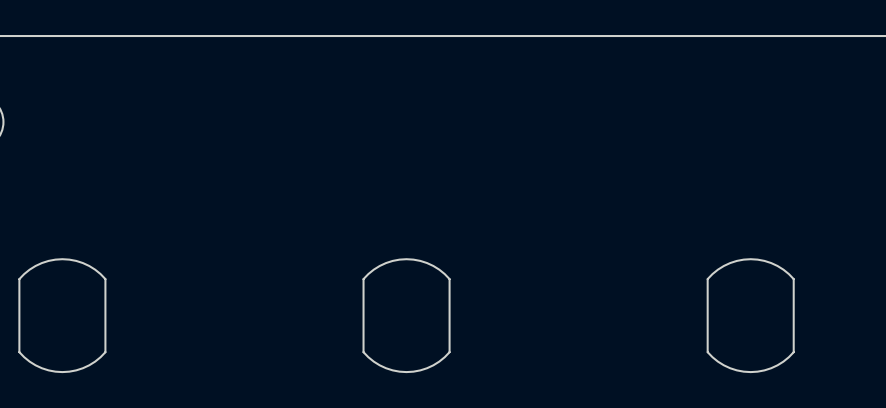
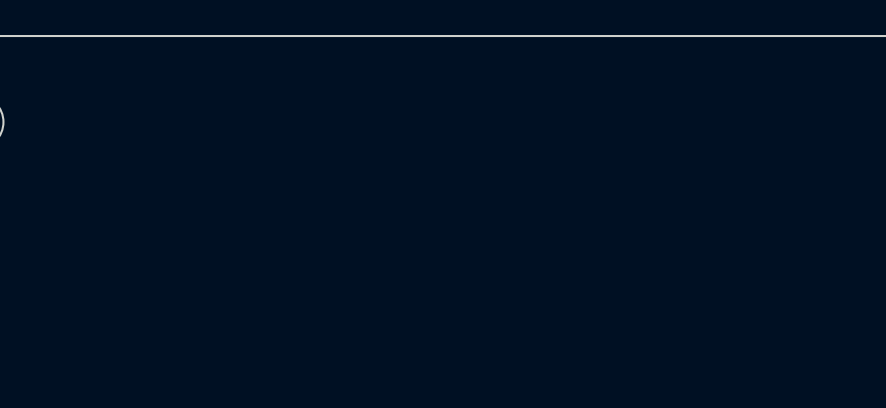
drawing: [18, 258, 107, 374] -> none
drawing: [362, 258, 451, 374] -> none
drawing: [706, 258, 795, 374] -> none

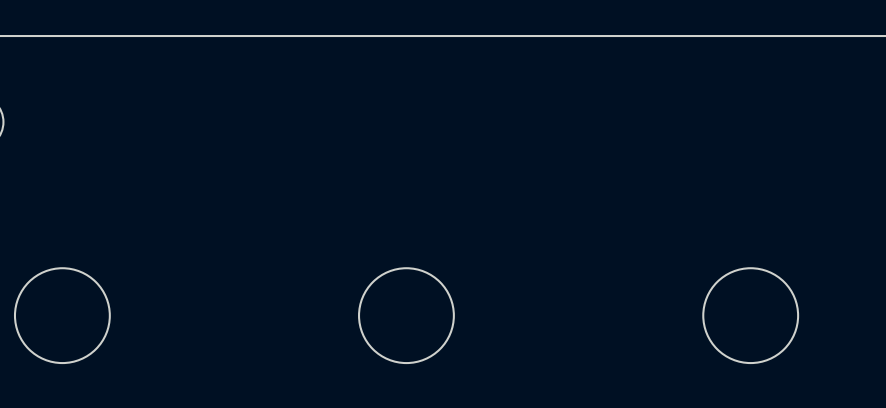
round board edge: none -> [13, 267, 111, 365]
round board edge: none -> [358, 267, 455, 365]
round board edge: none -> [702, 267, 800, 365]

